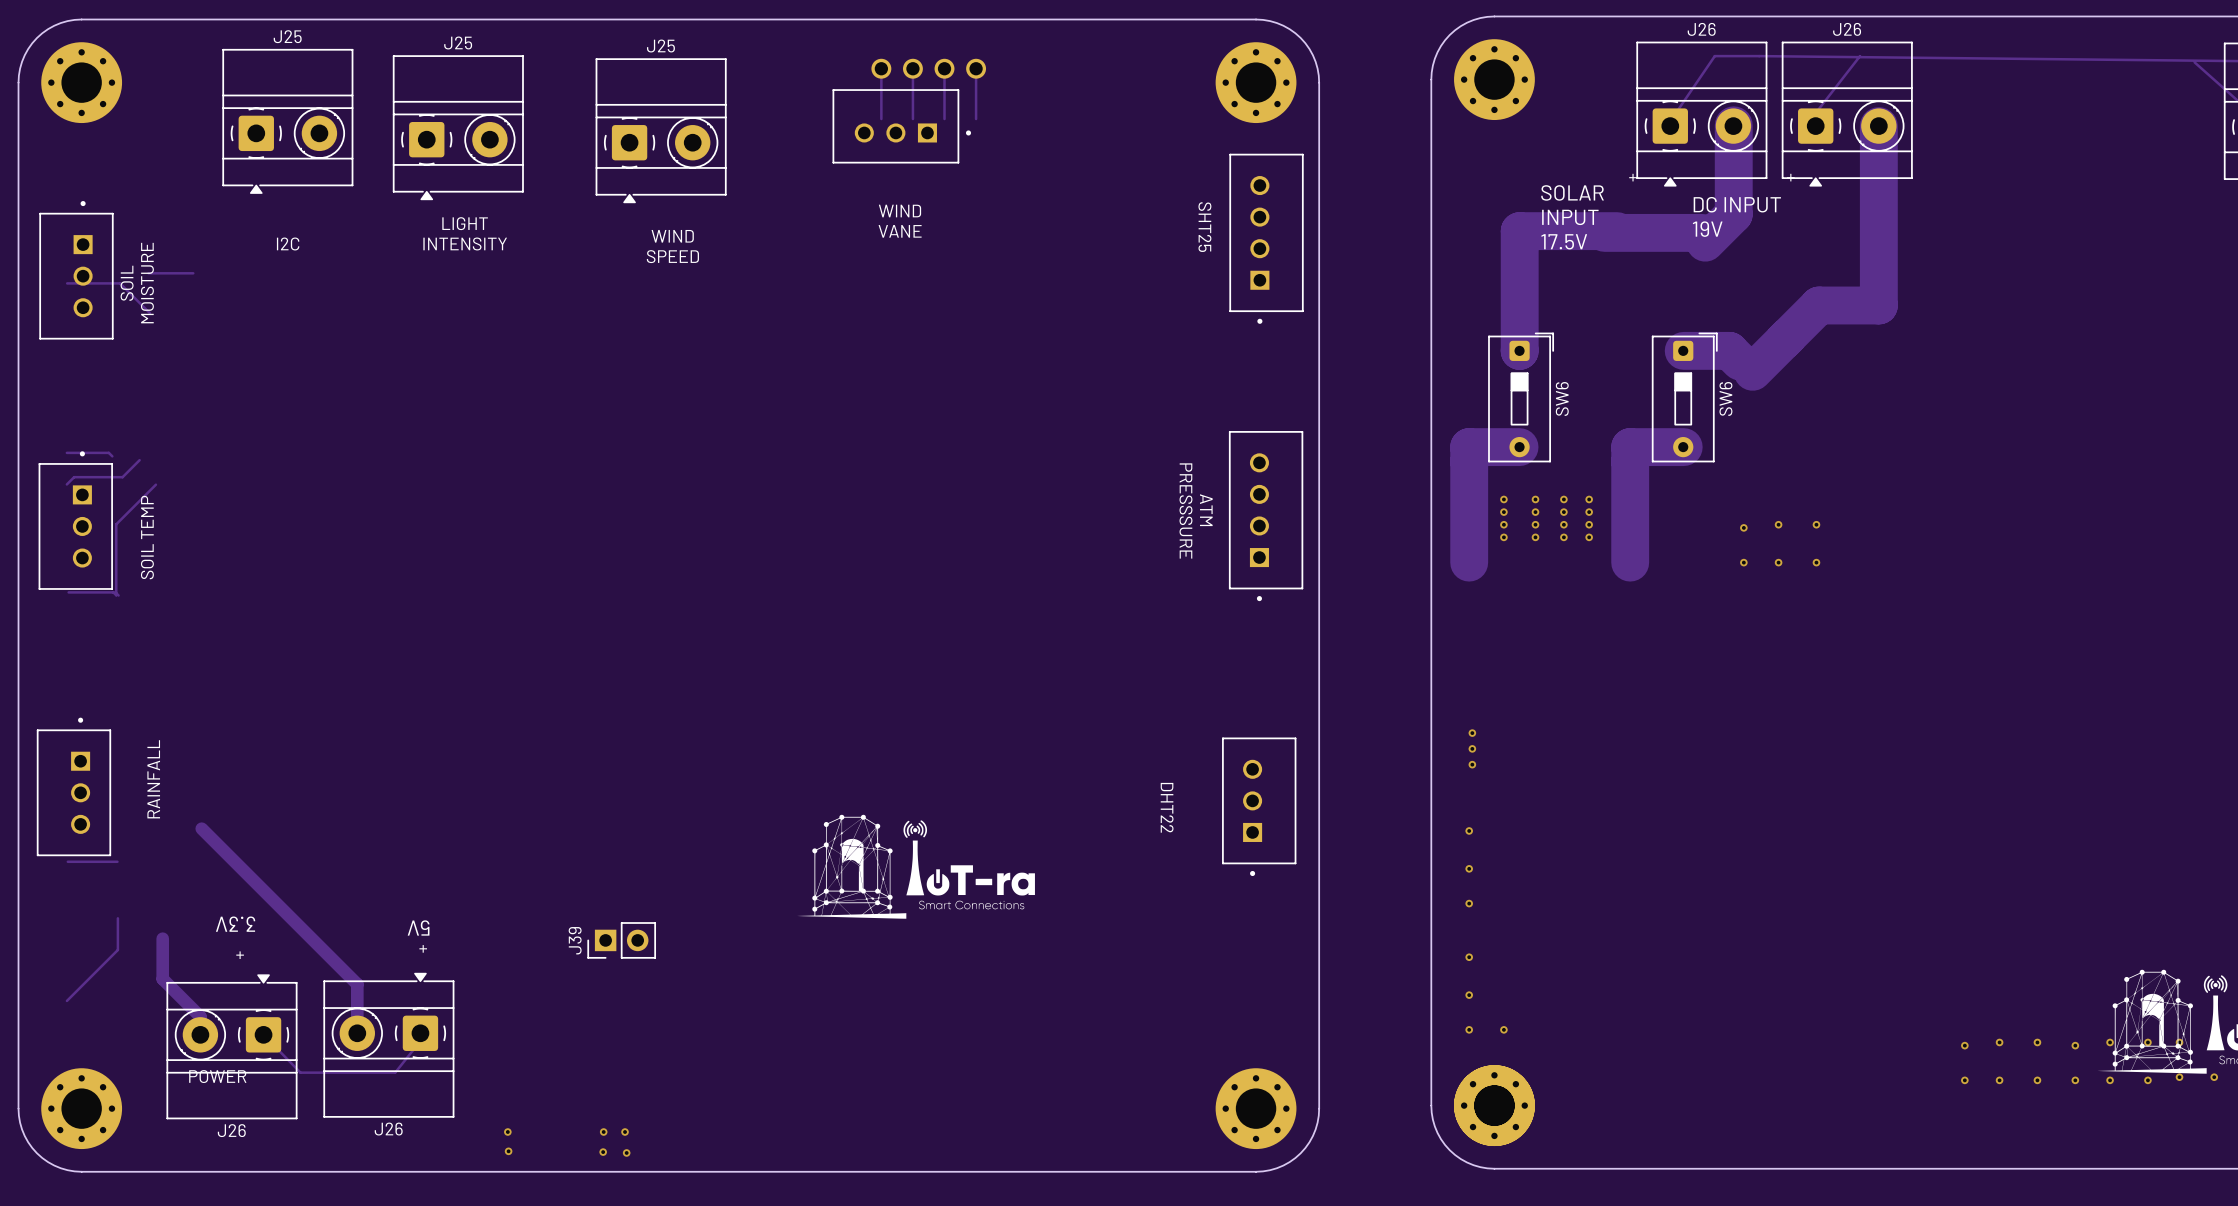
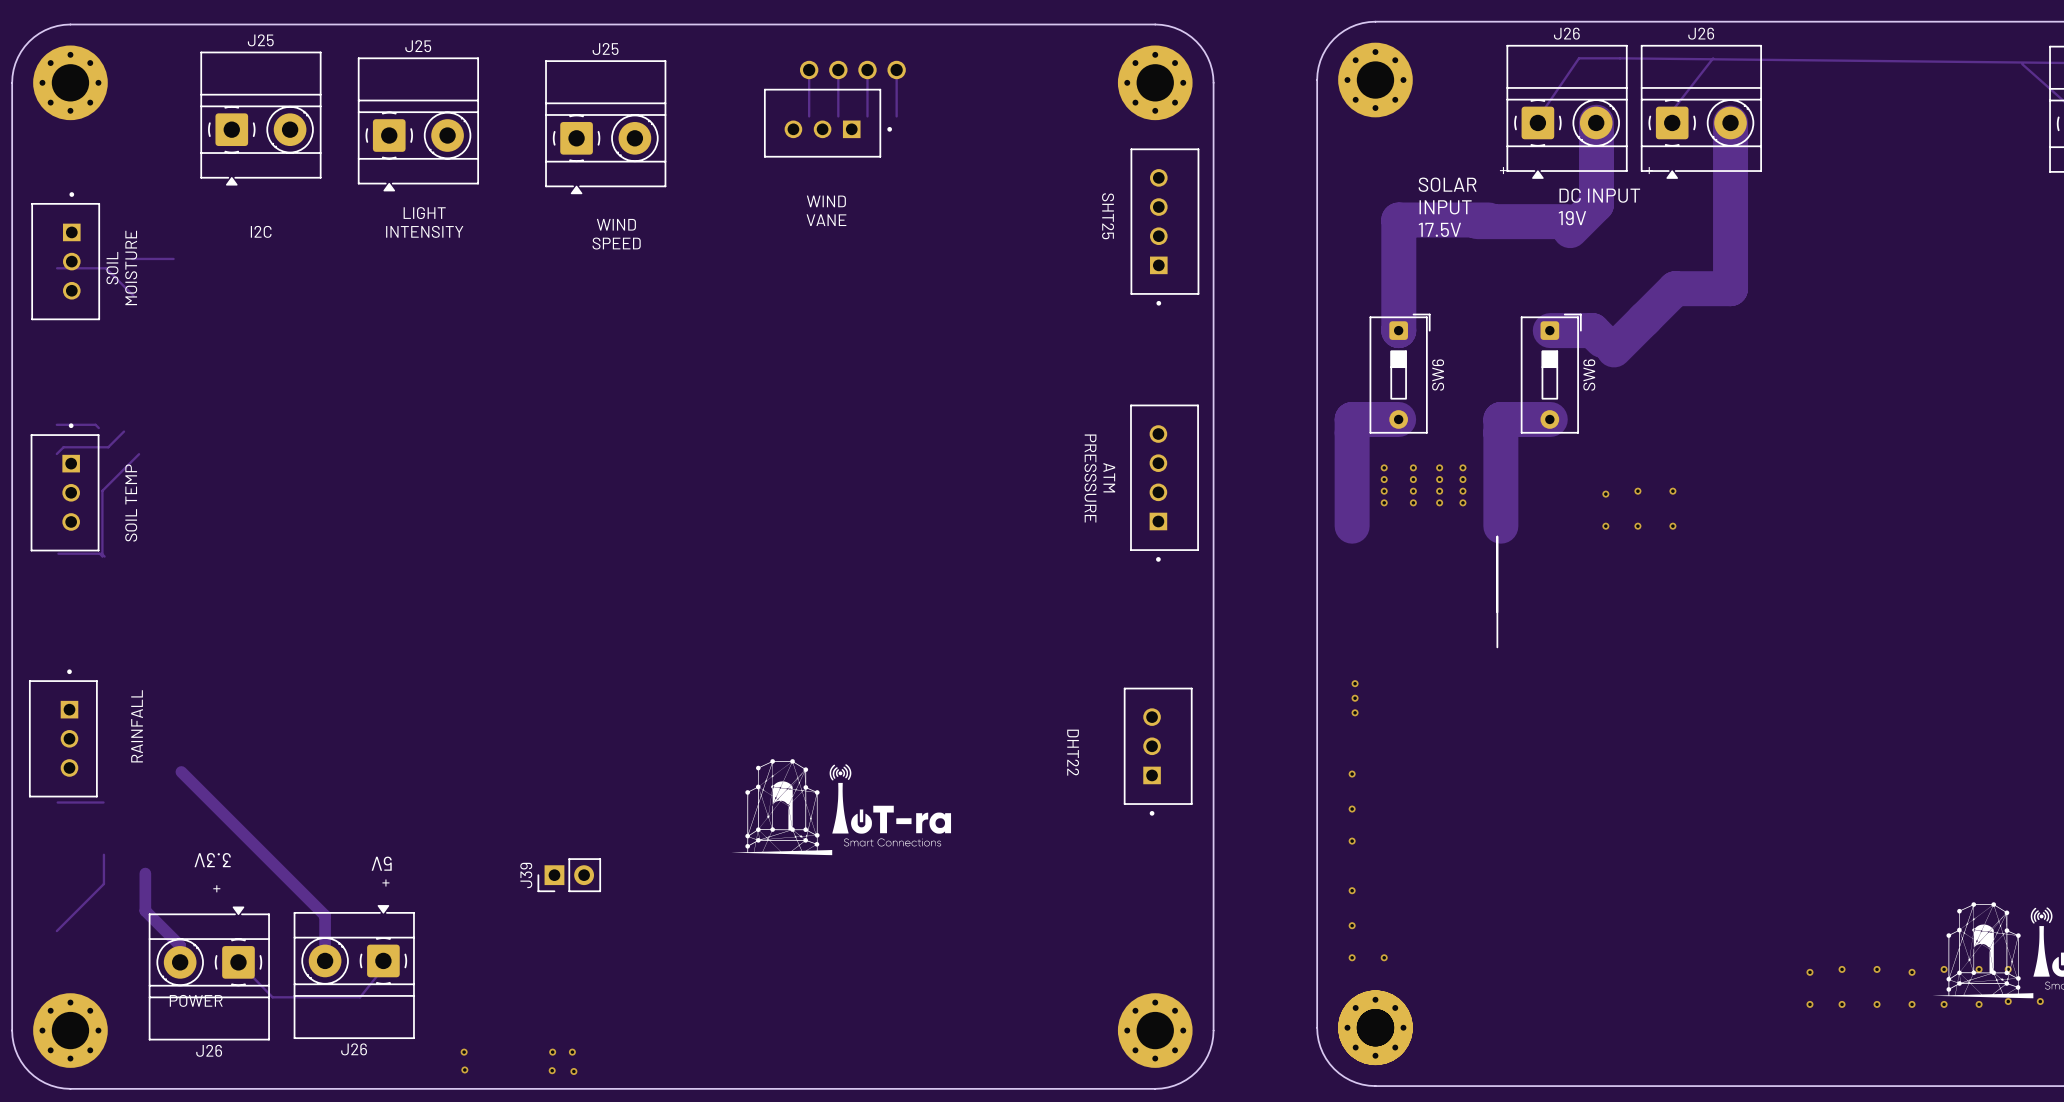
line: none -> (1497, 536) (1497, 647)

